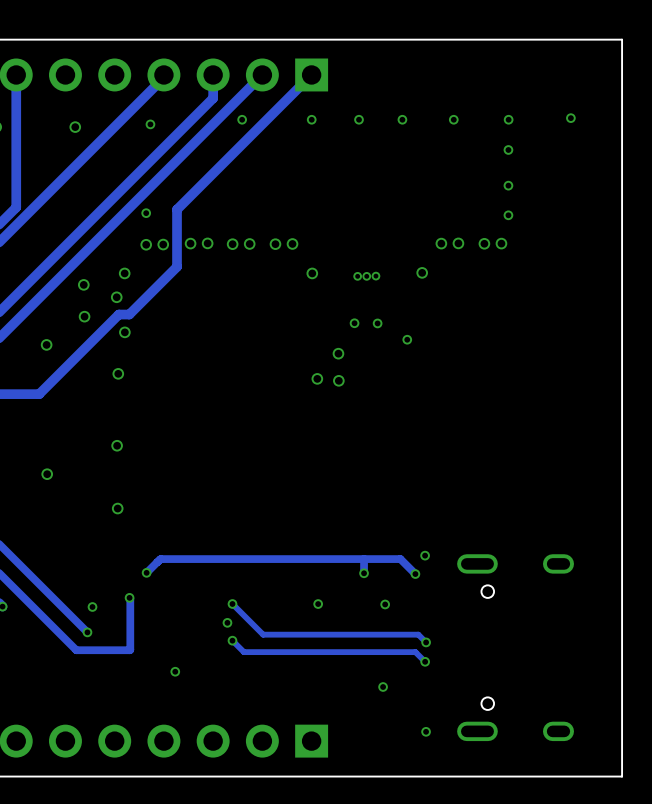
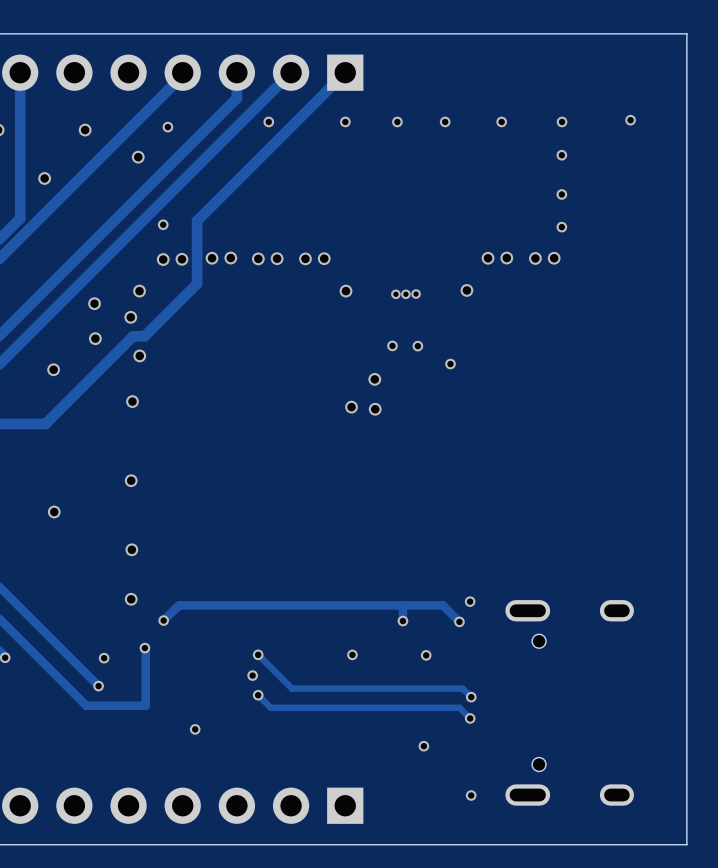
via: none -> (138, 157)
via: none -> (44, 178)
via: none -> (131, 599)

